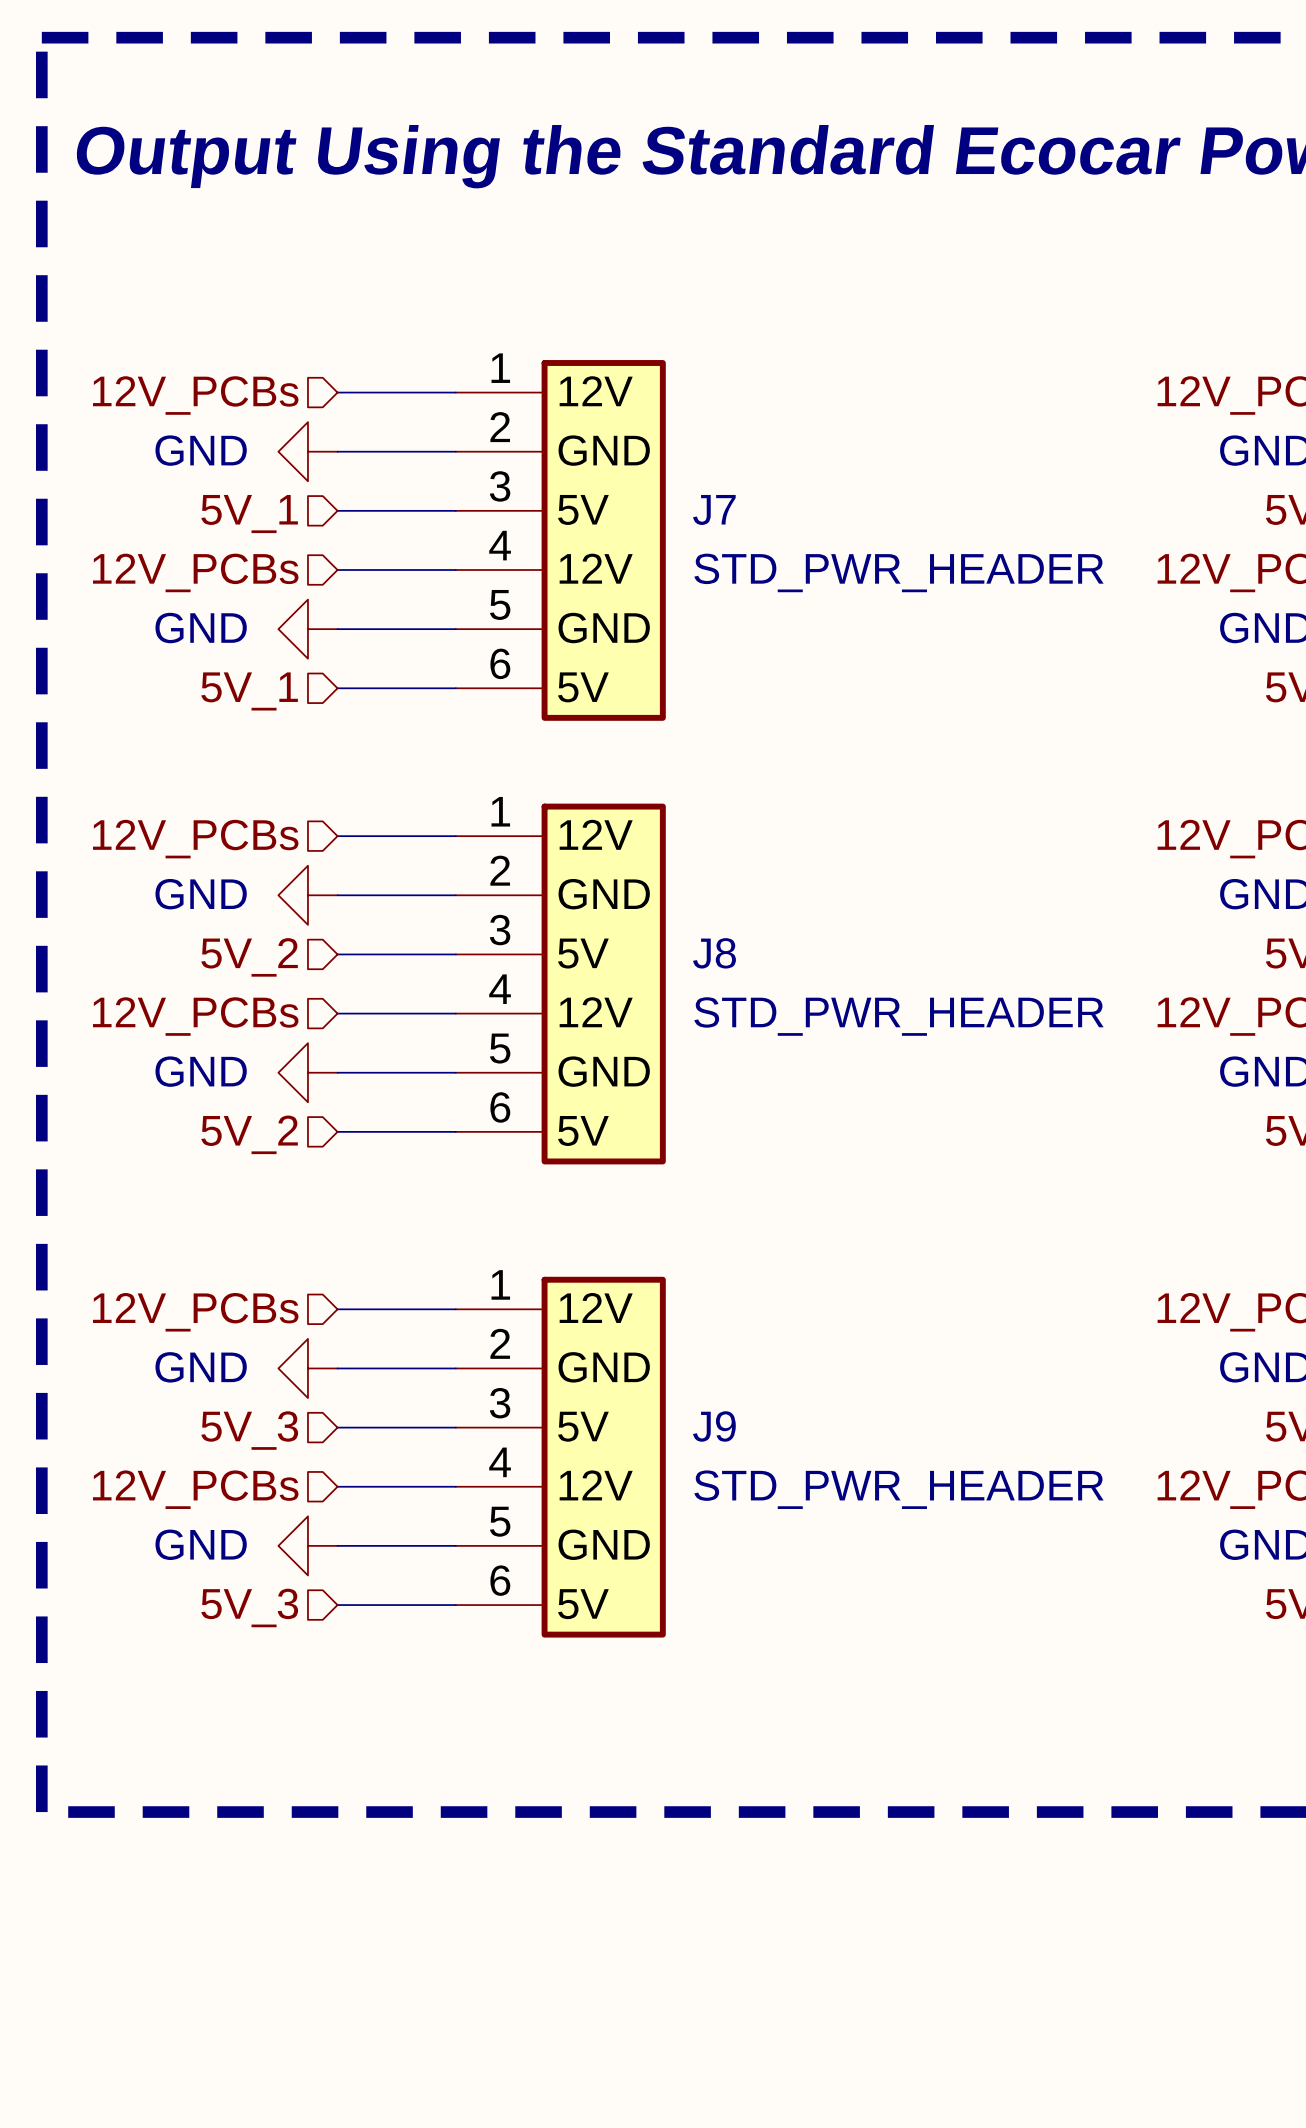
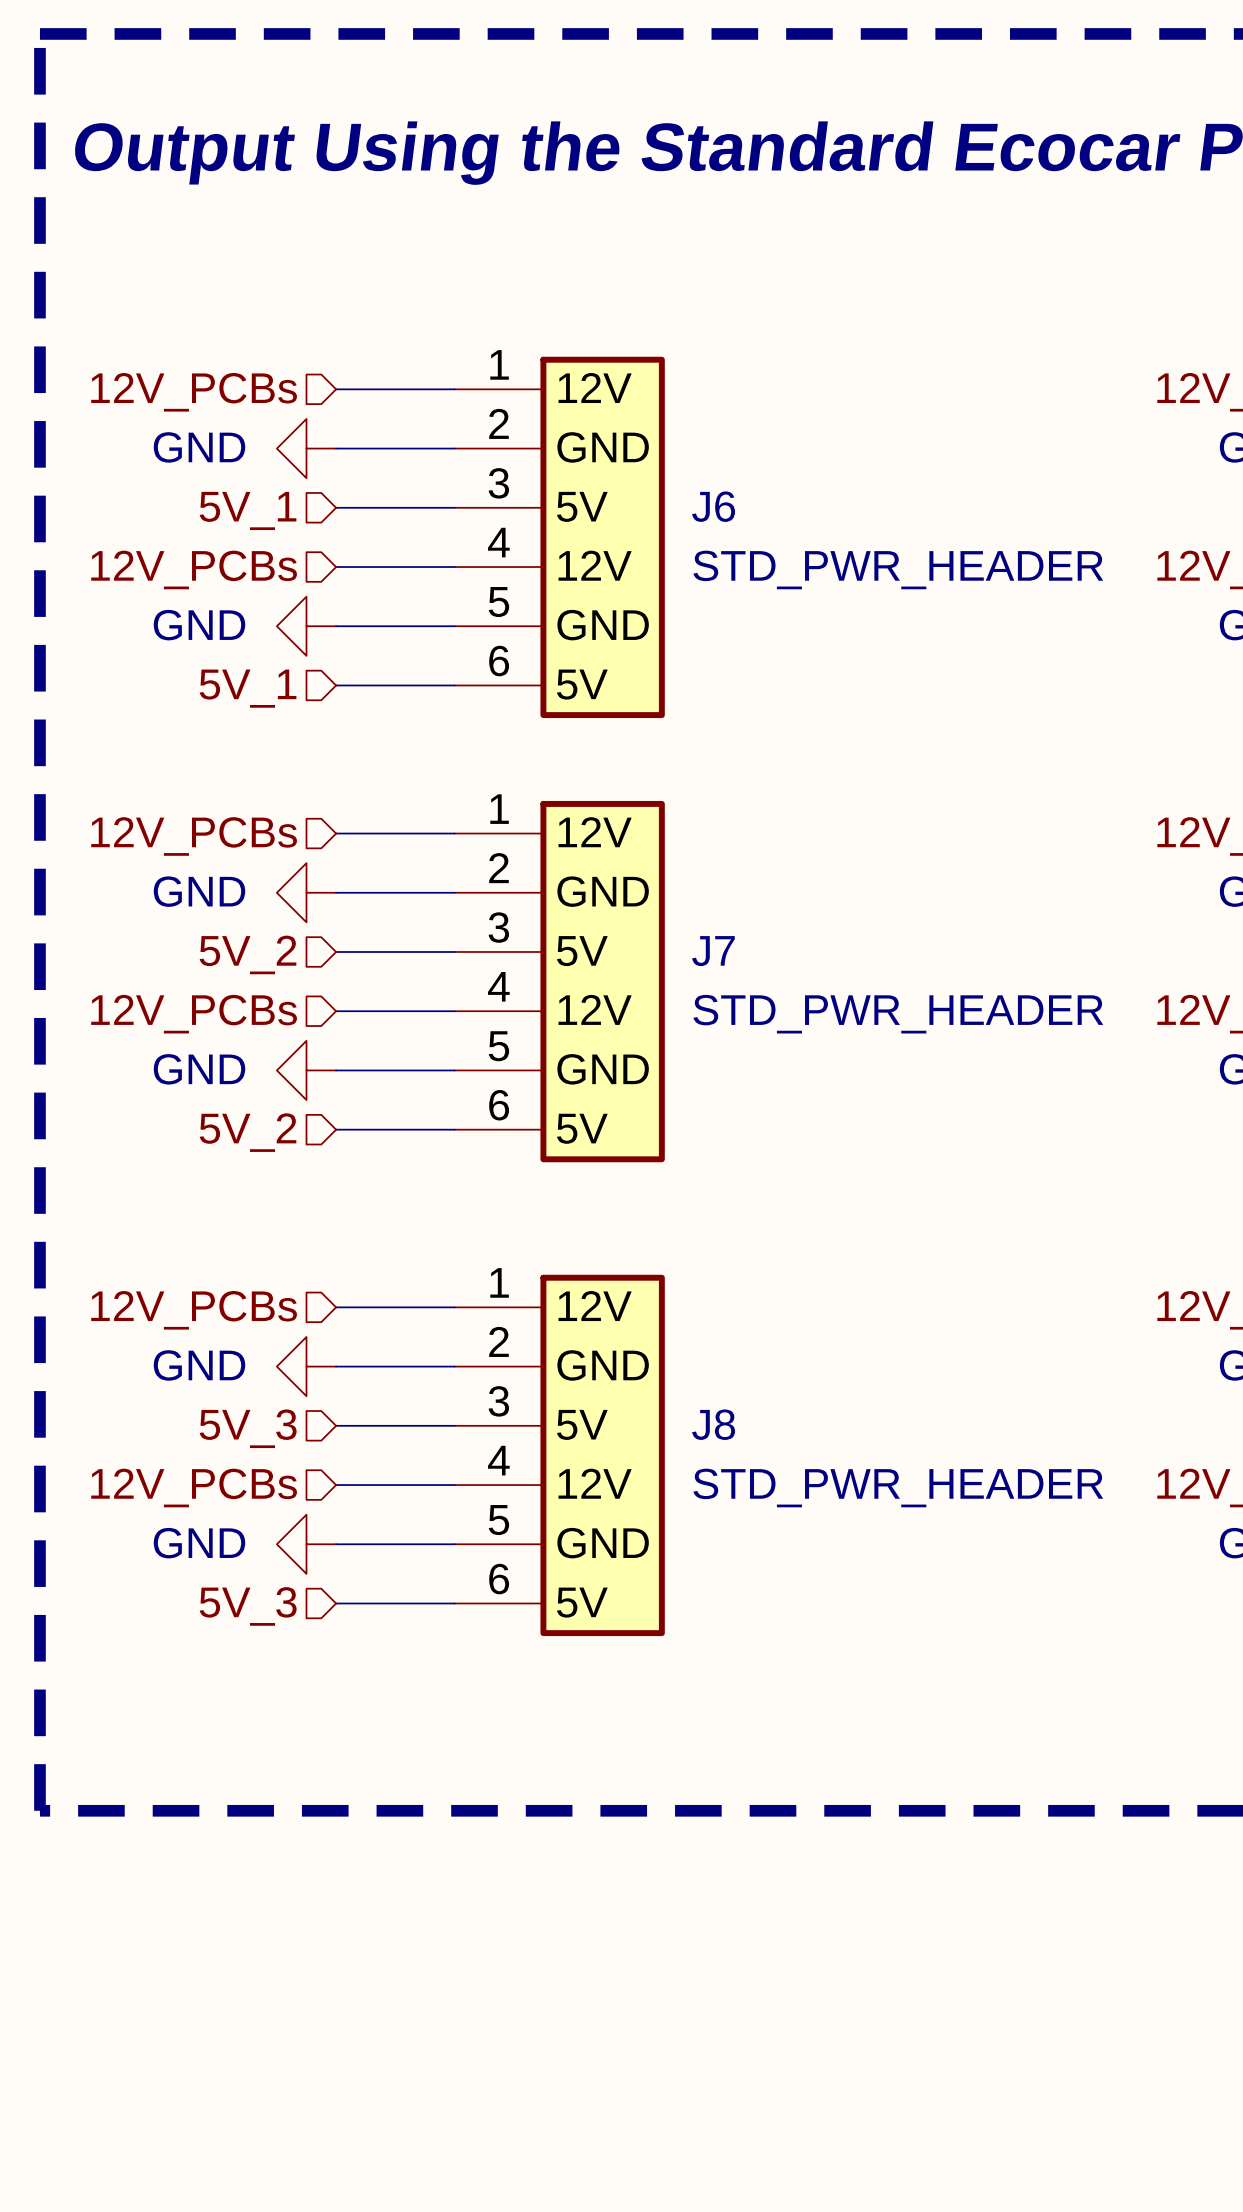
J7 name: J7 (714, 509) -> J6 (713, 506)
J8 name: J8 (714, 953) -> J7 (713, 951)
J9 name: J9 (714, 1426) -> J8 (713, 1424)

